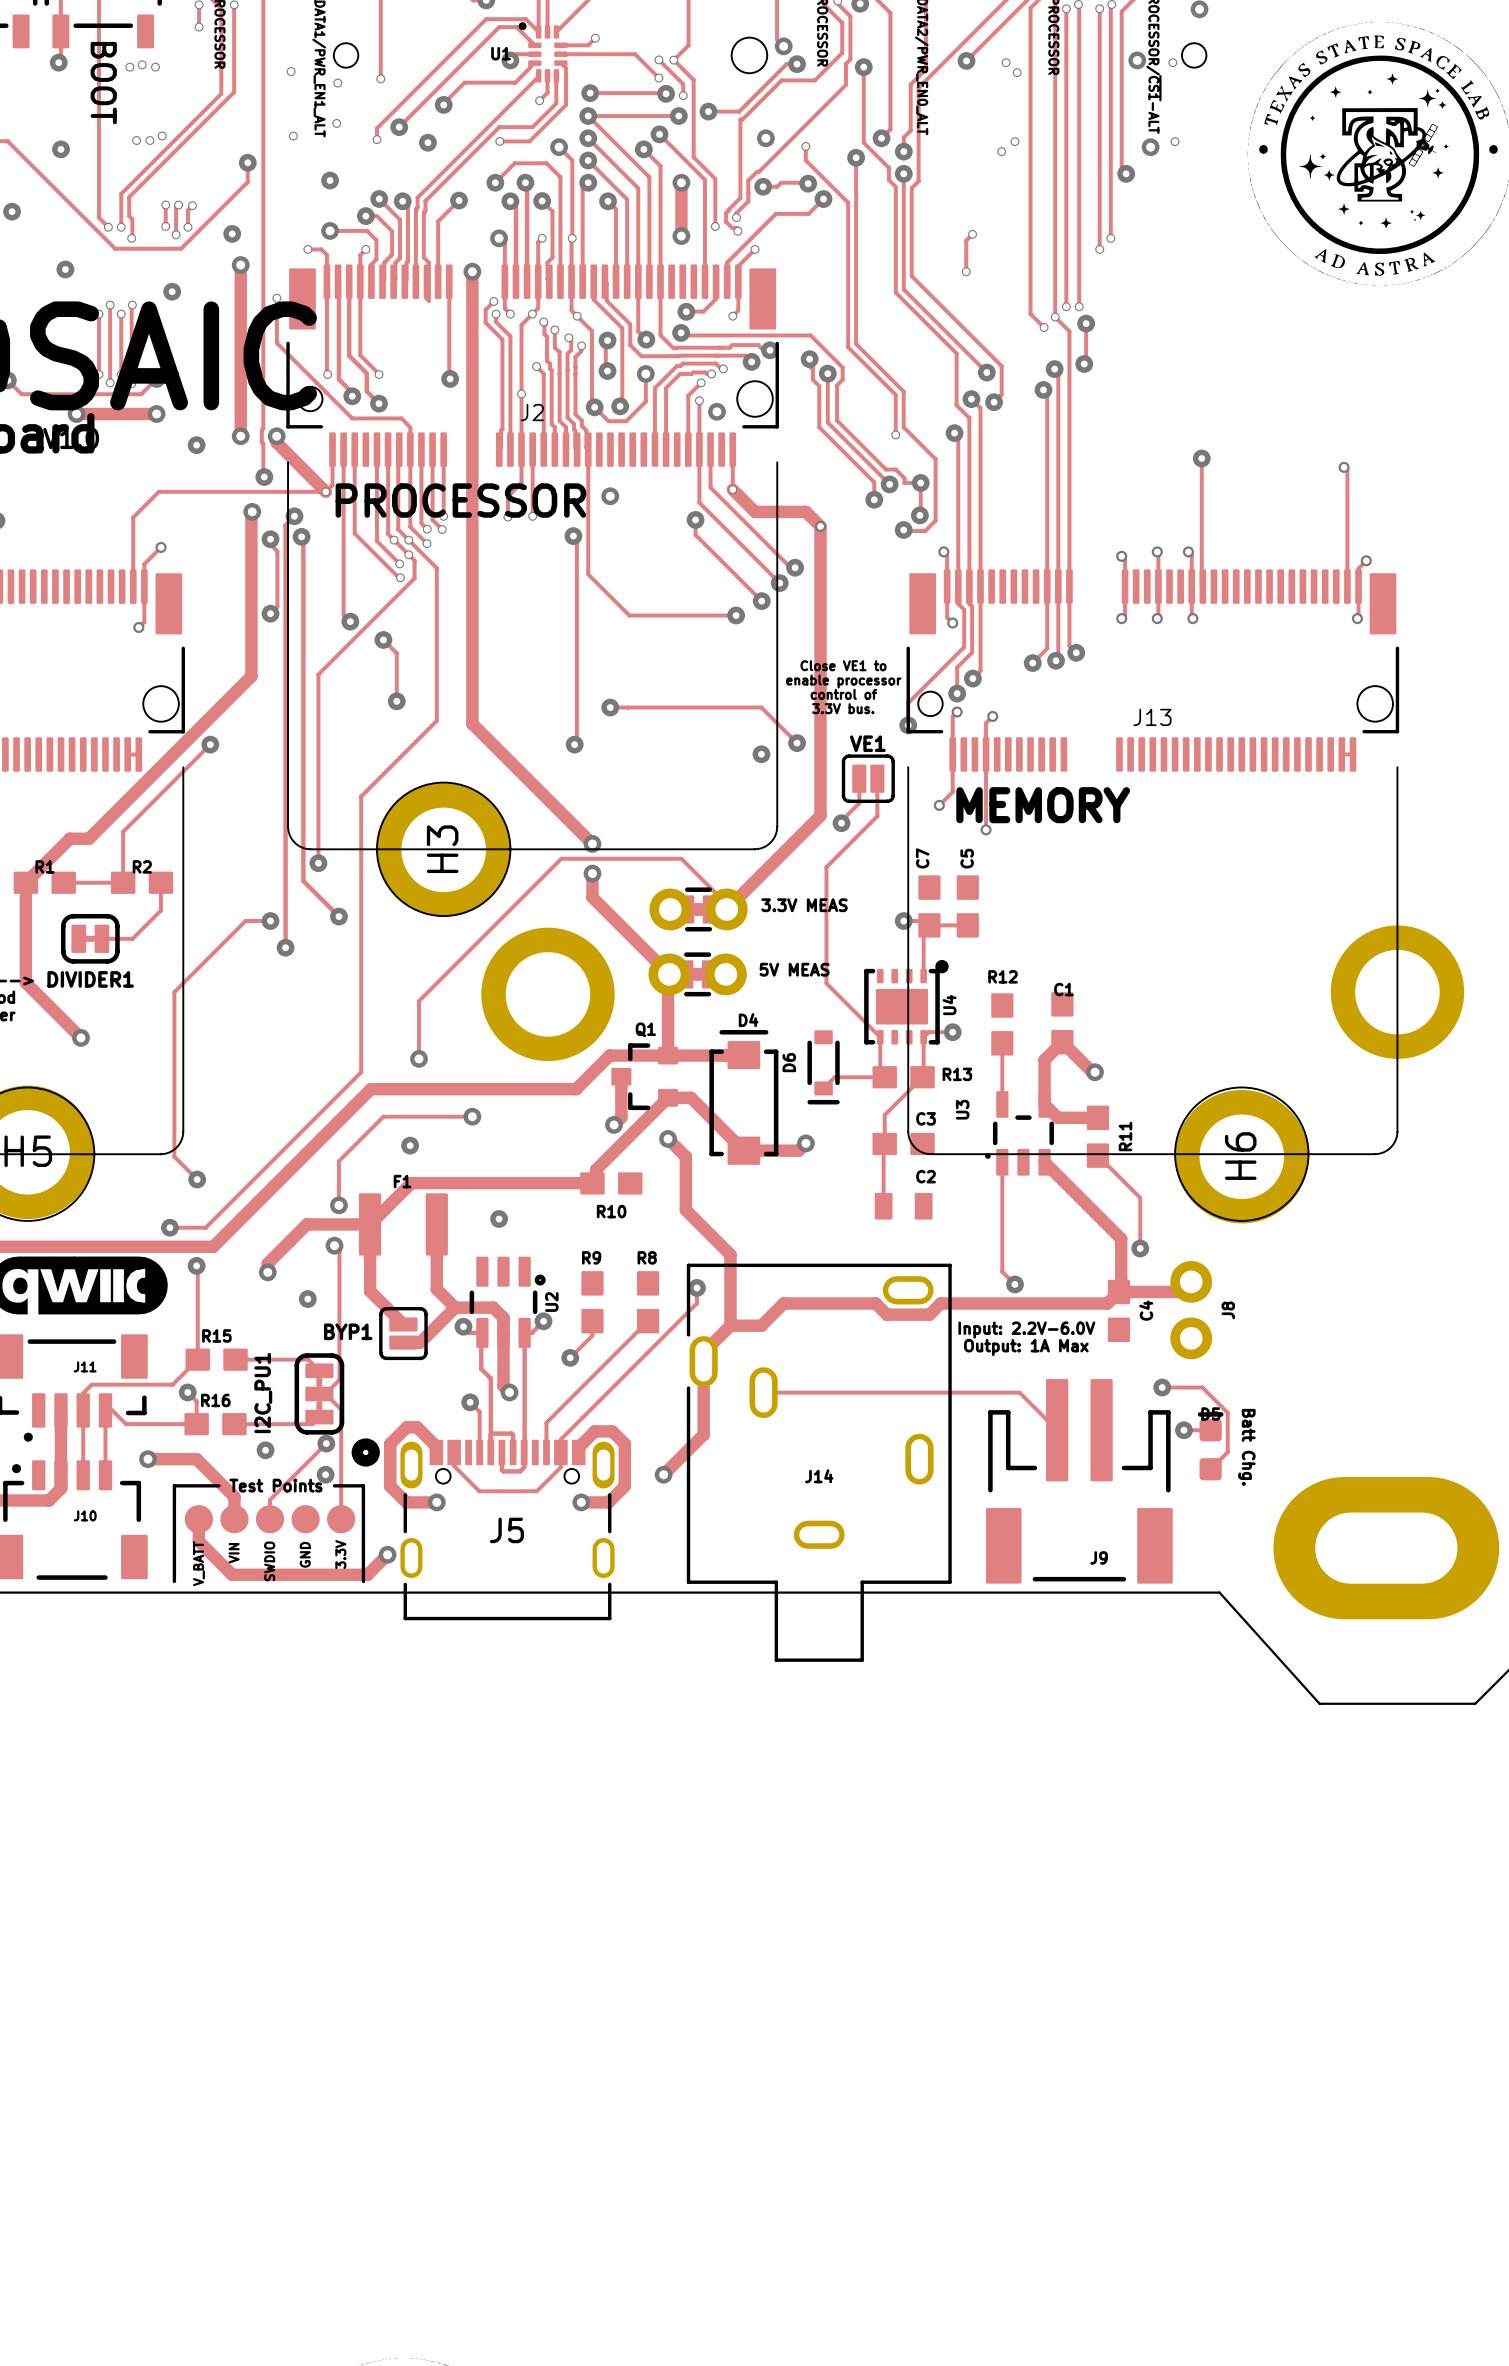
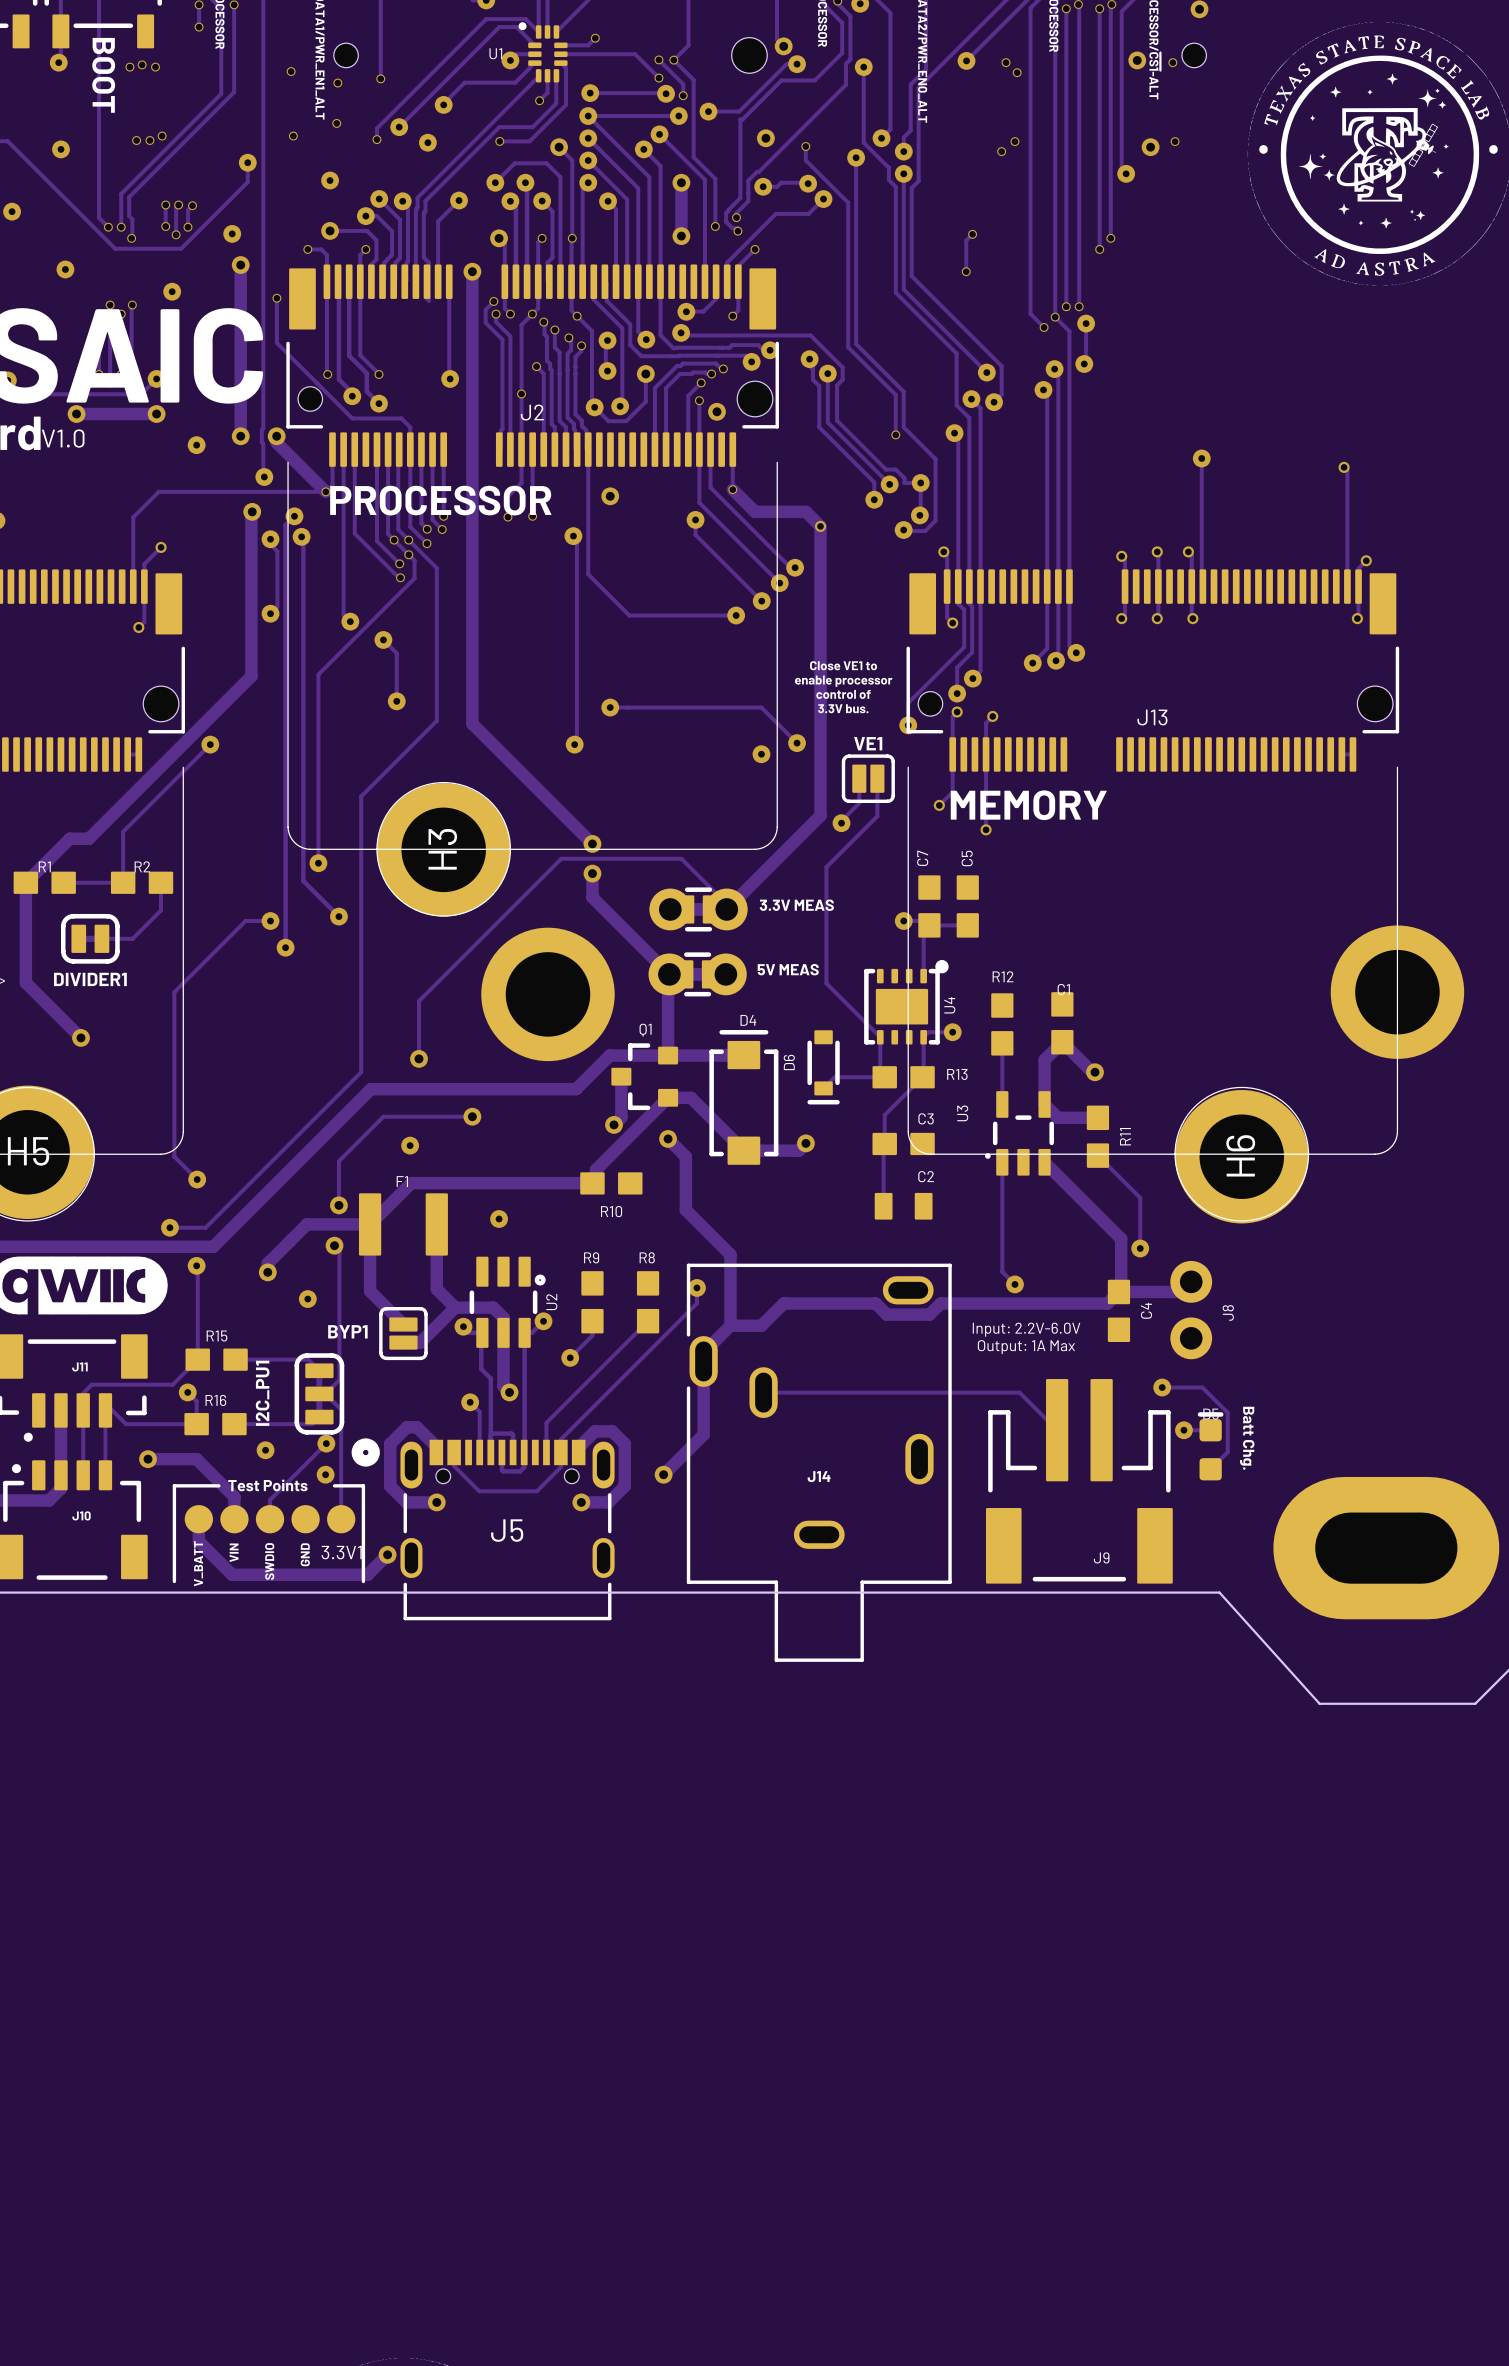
3.3V name: 3.3V (340, 1554) -> 3.3V1 (341, 1552)

